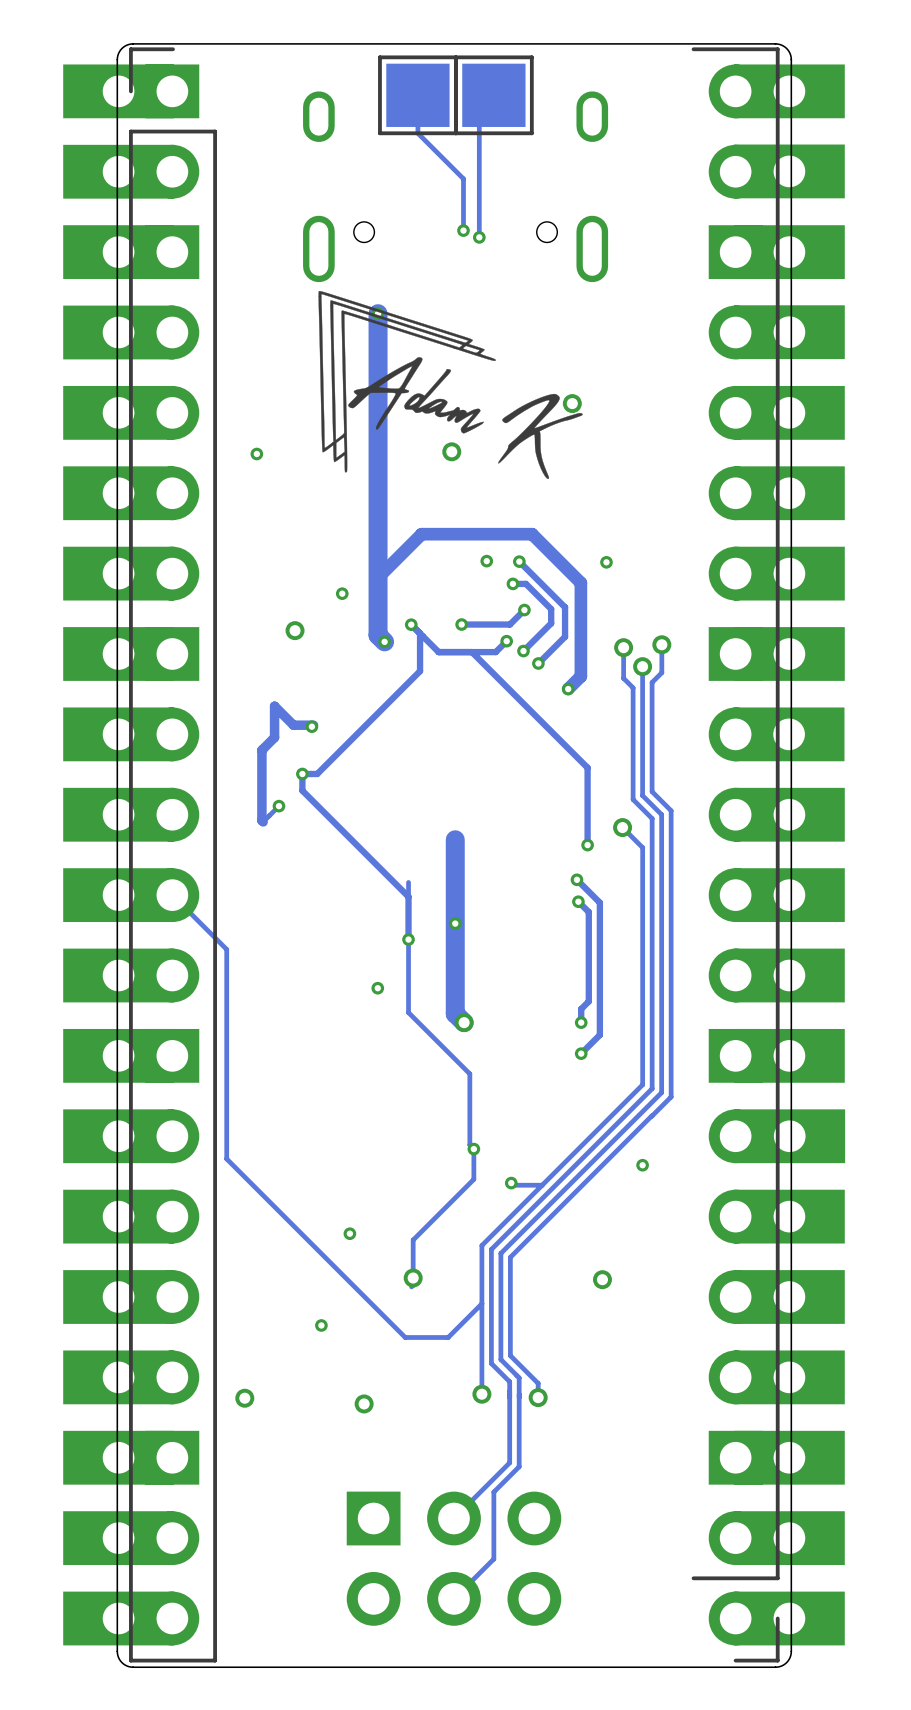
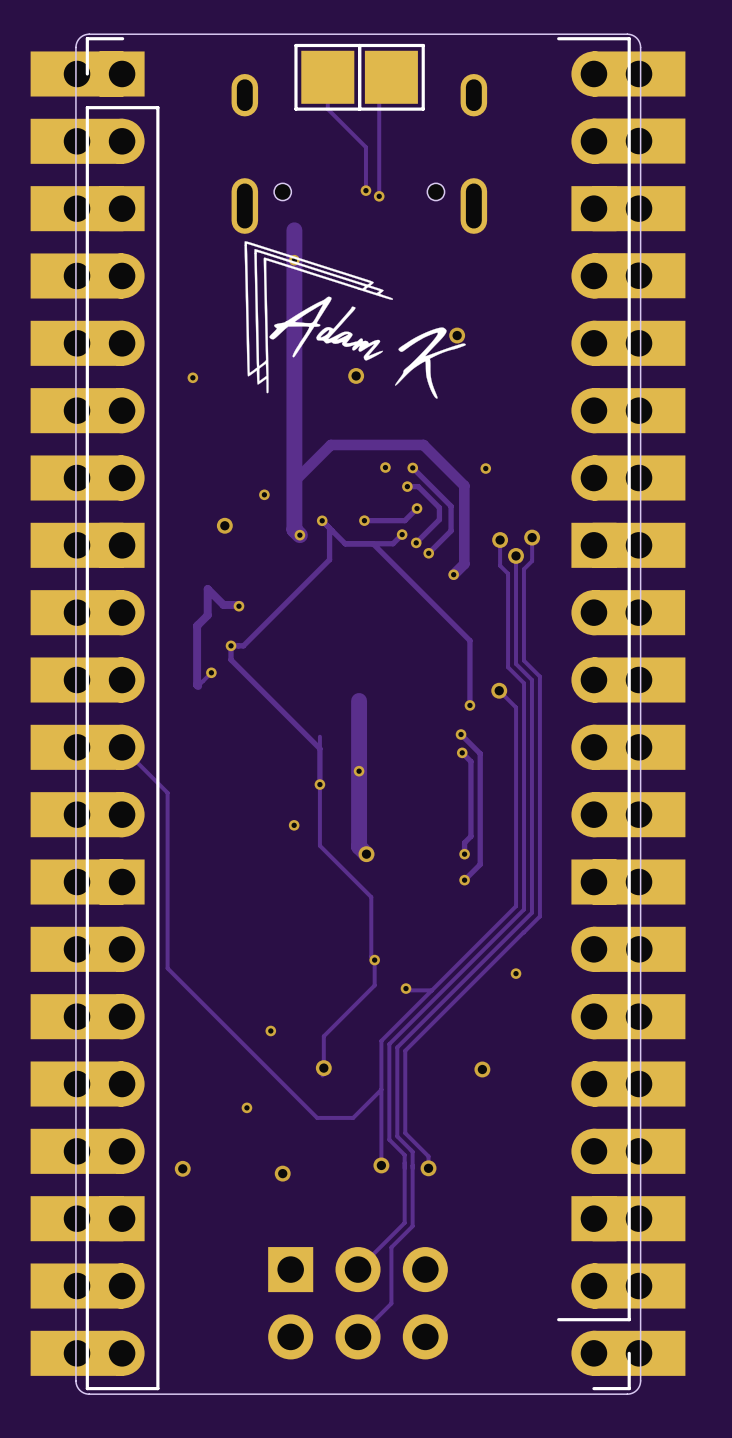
track: none -> (294, 230) (294, 260)

